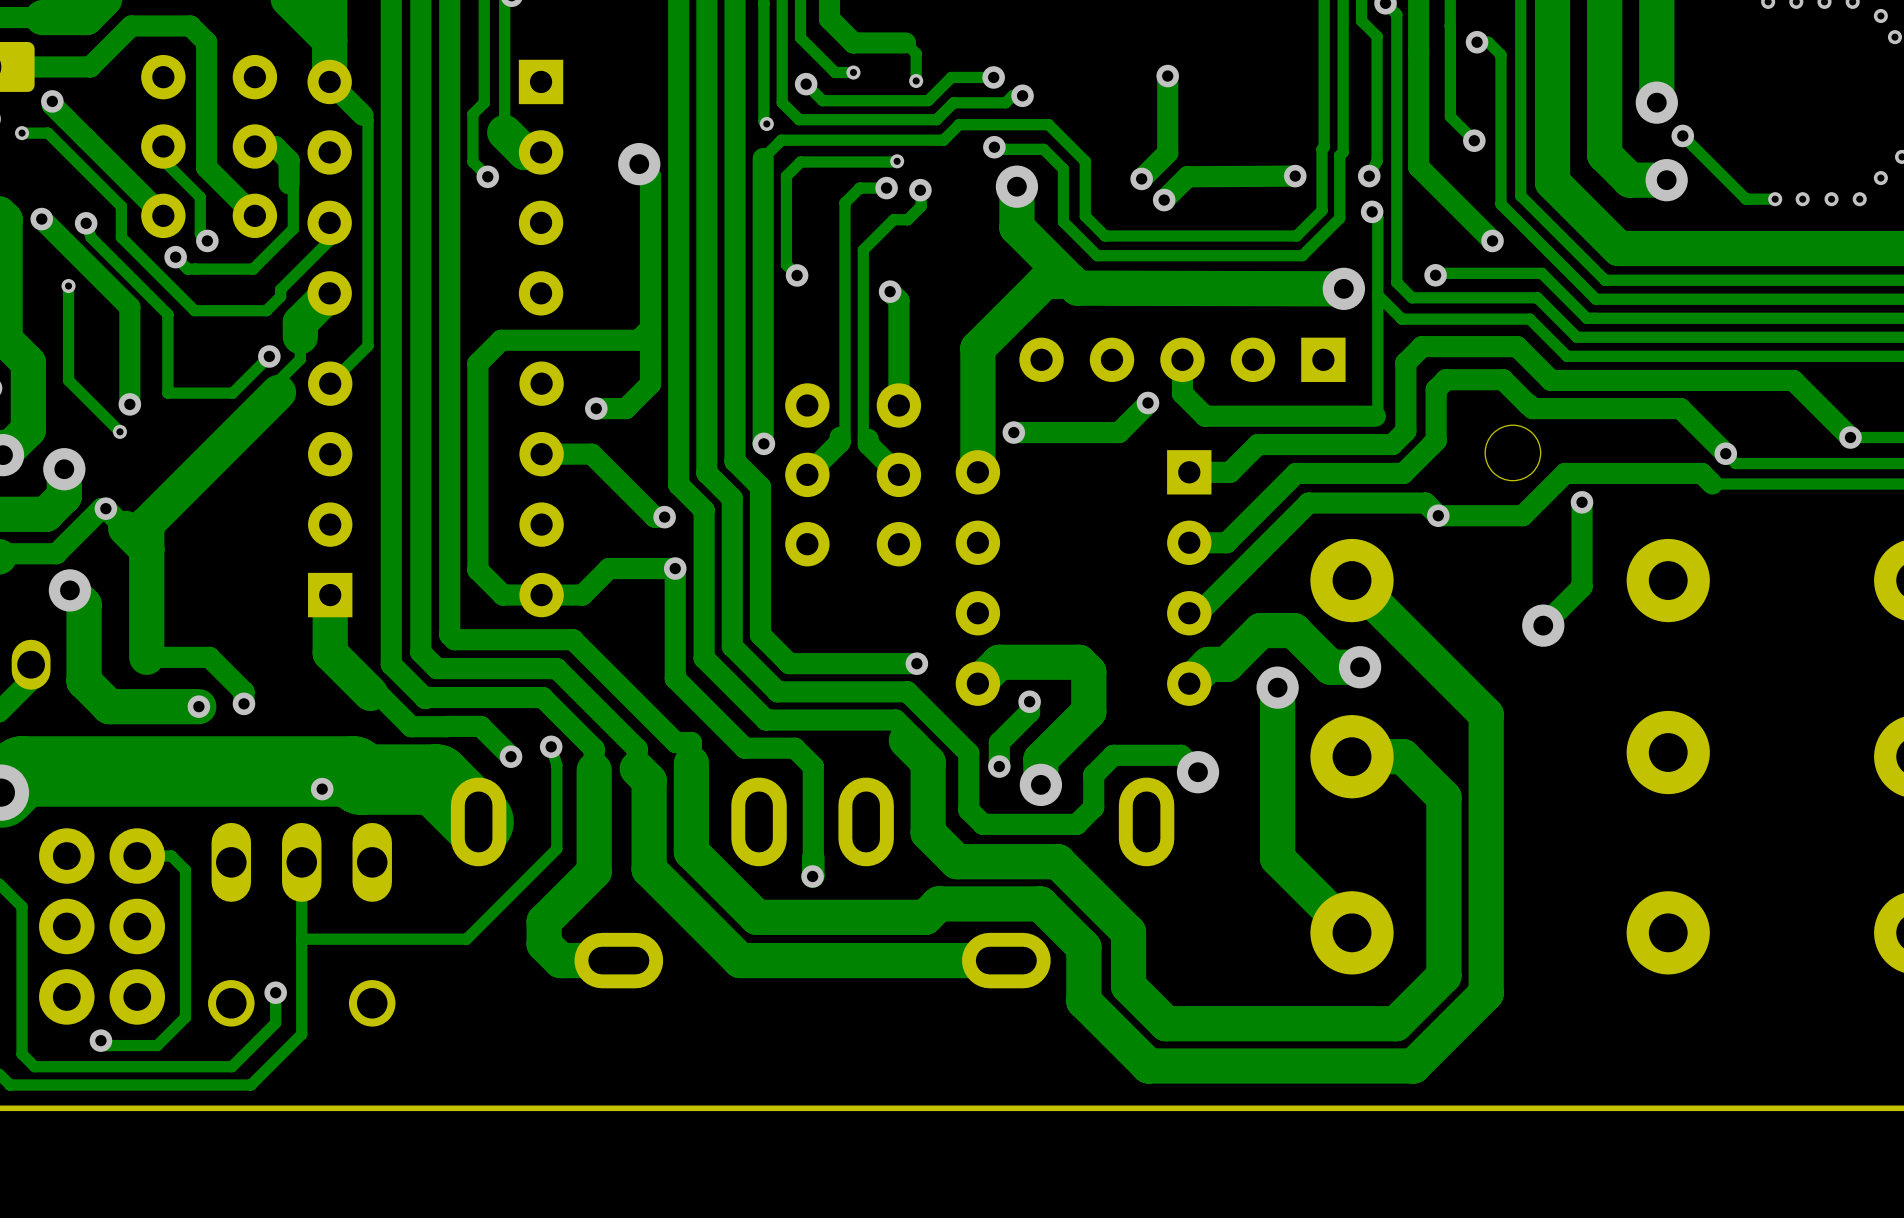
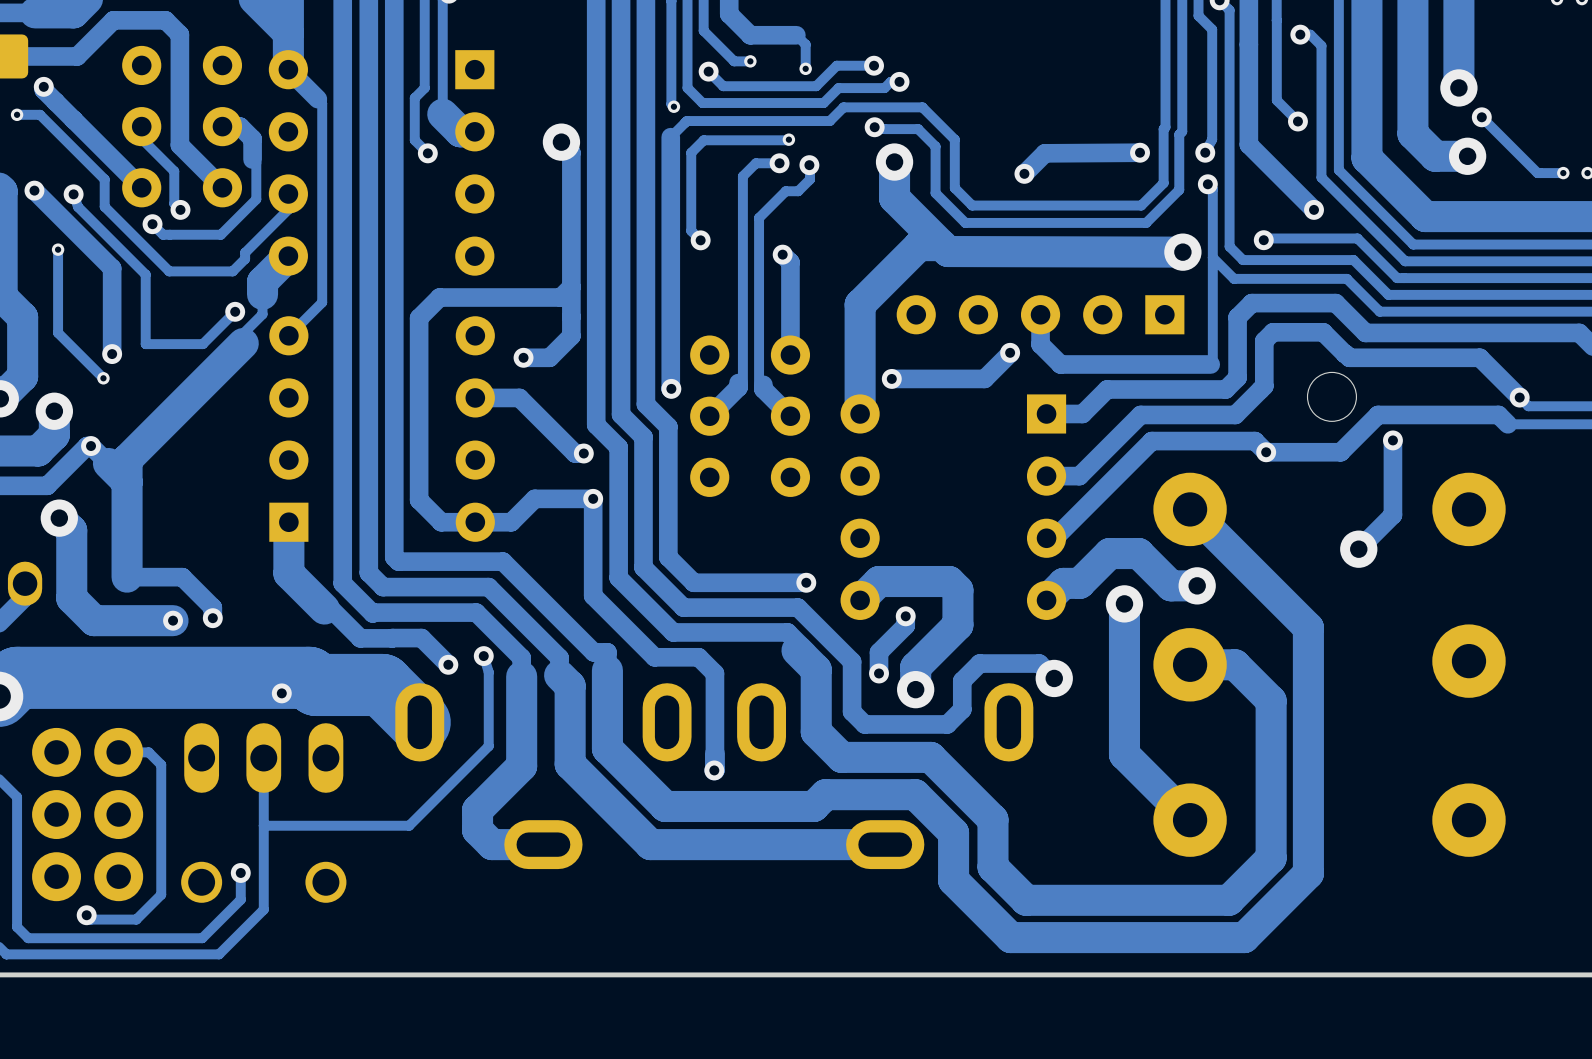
track: (1167, 76) (1167, 152) (1141, 178) -> none
via: (1167, 76) -> none
via: (1141, 178) -> none

